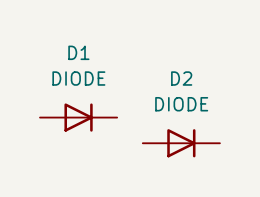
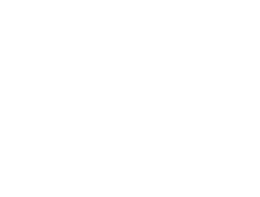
D1: DIODE (78, 117) -> none
D2: DIODE (181, 143) -> none

